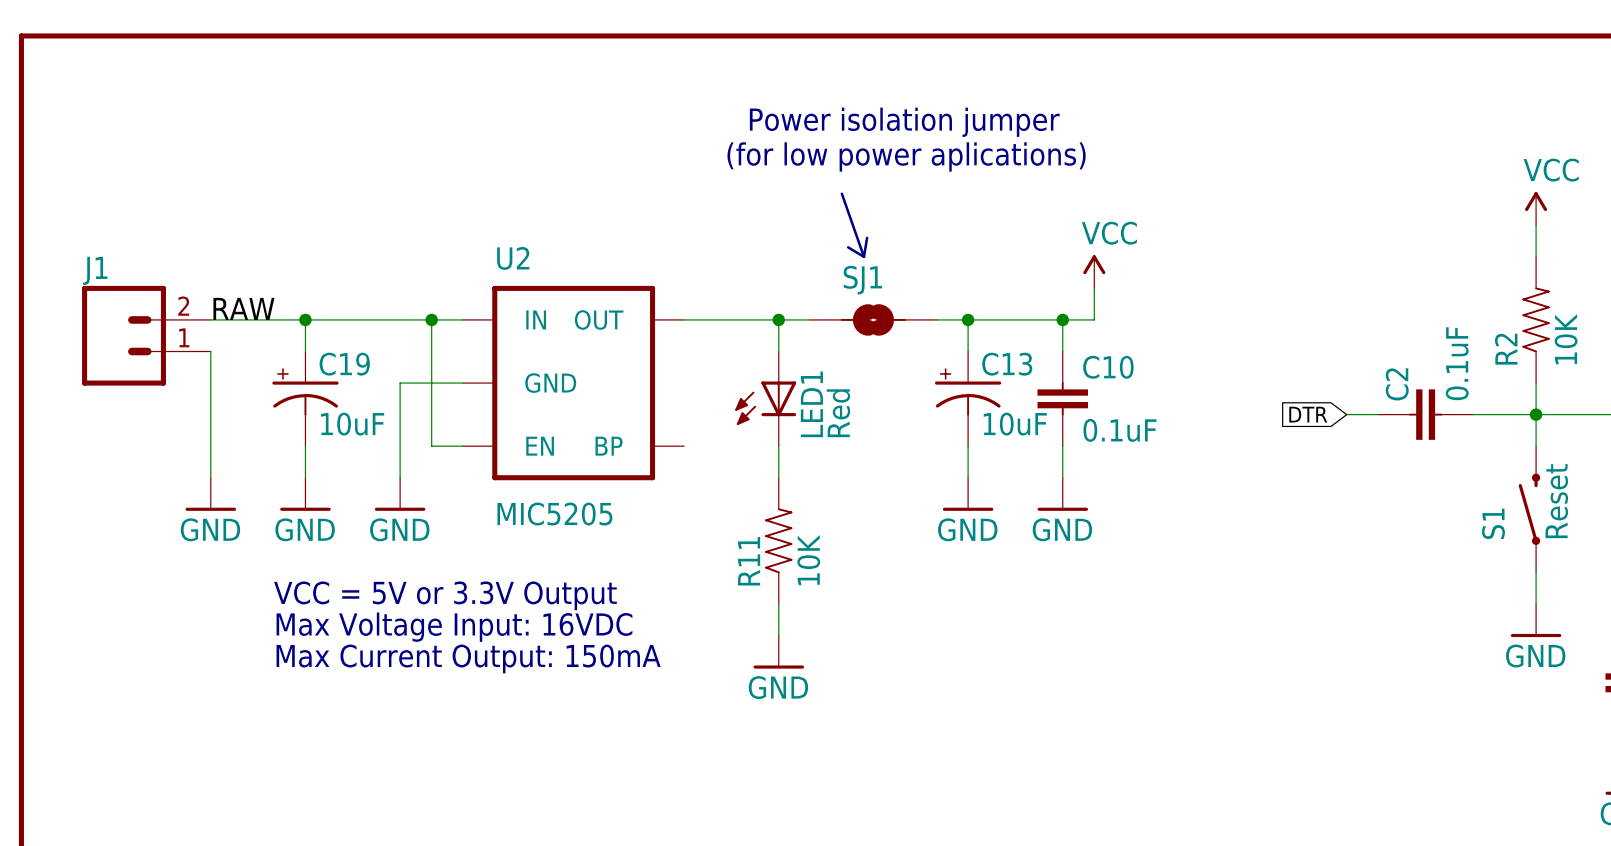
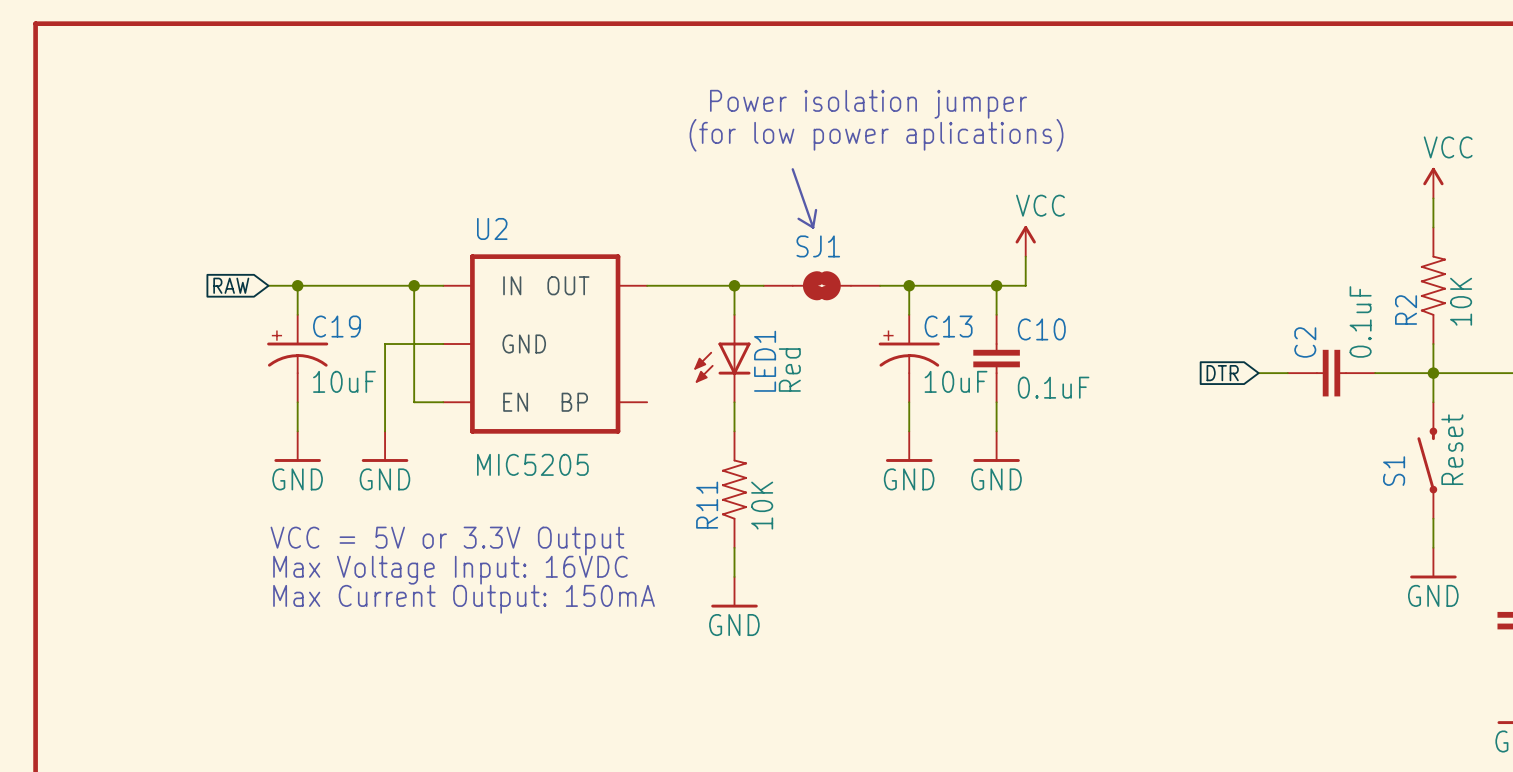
label: RAW (243, 308) -> none
wire: (210, 319) (273, 319) -> none
global label: none -> RAW (231, 285)
J1: (146, 335) -> none
wire: (210, 351) (210, 477) -> none
power symbol: GND (210, 494) -> none

